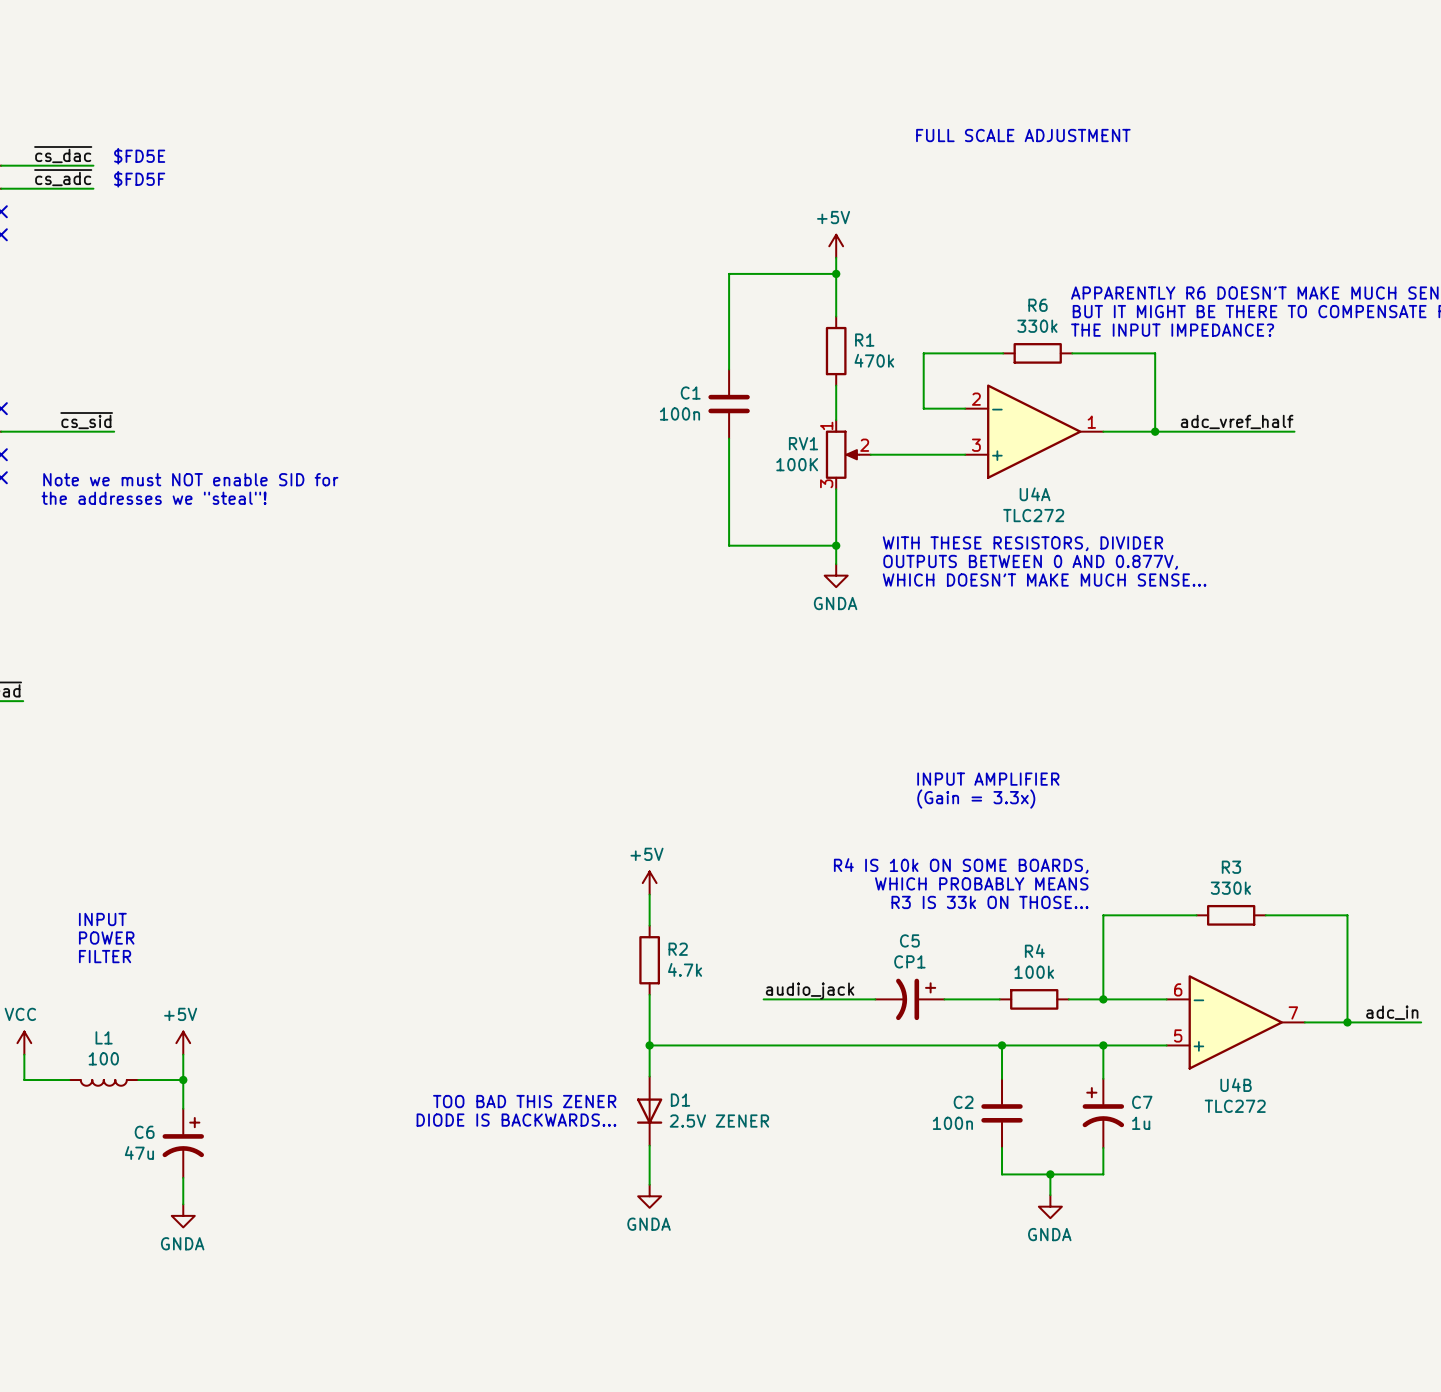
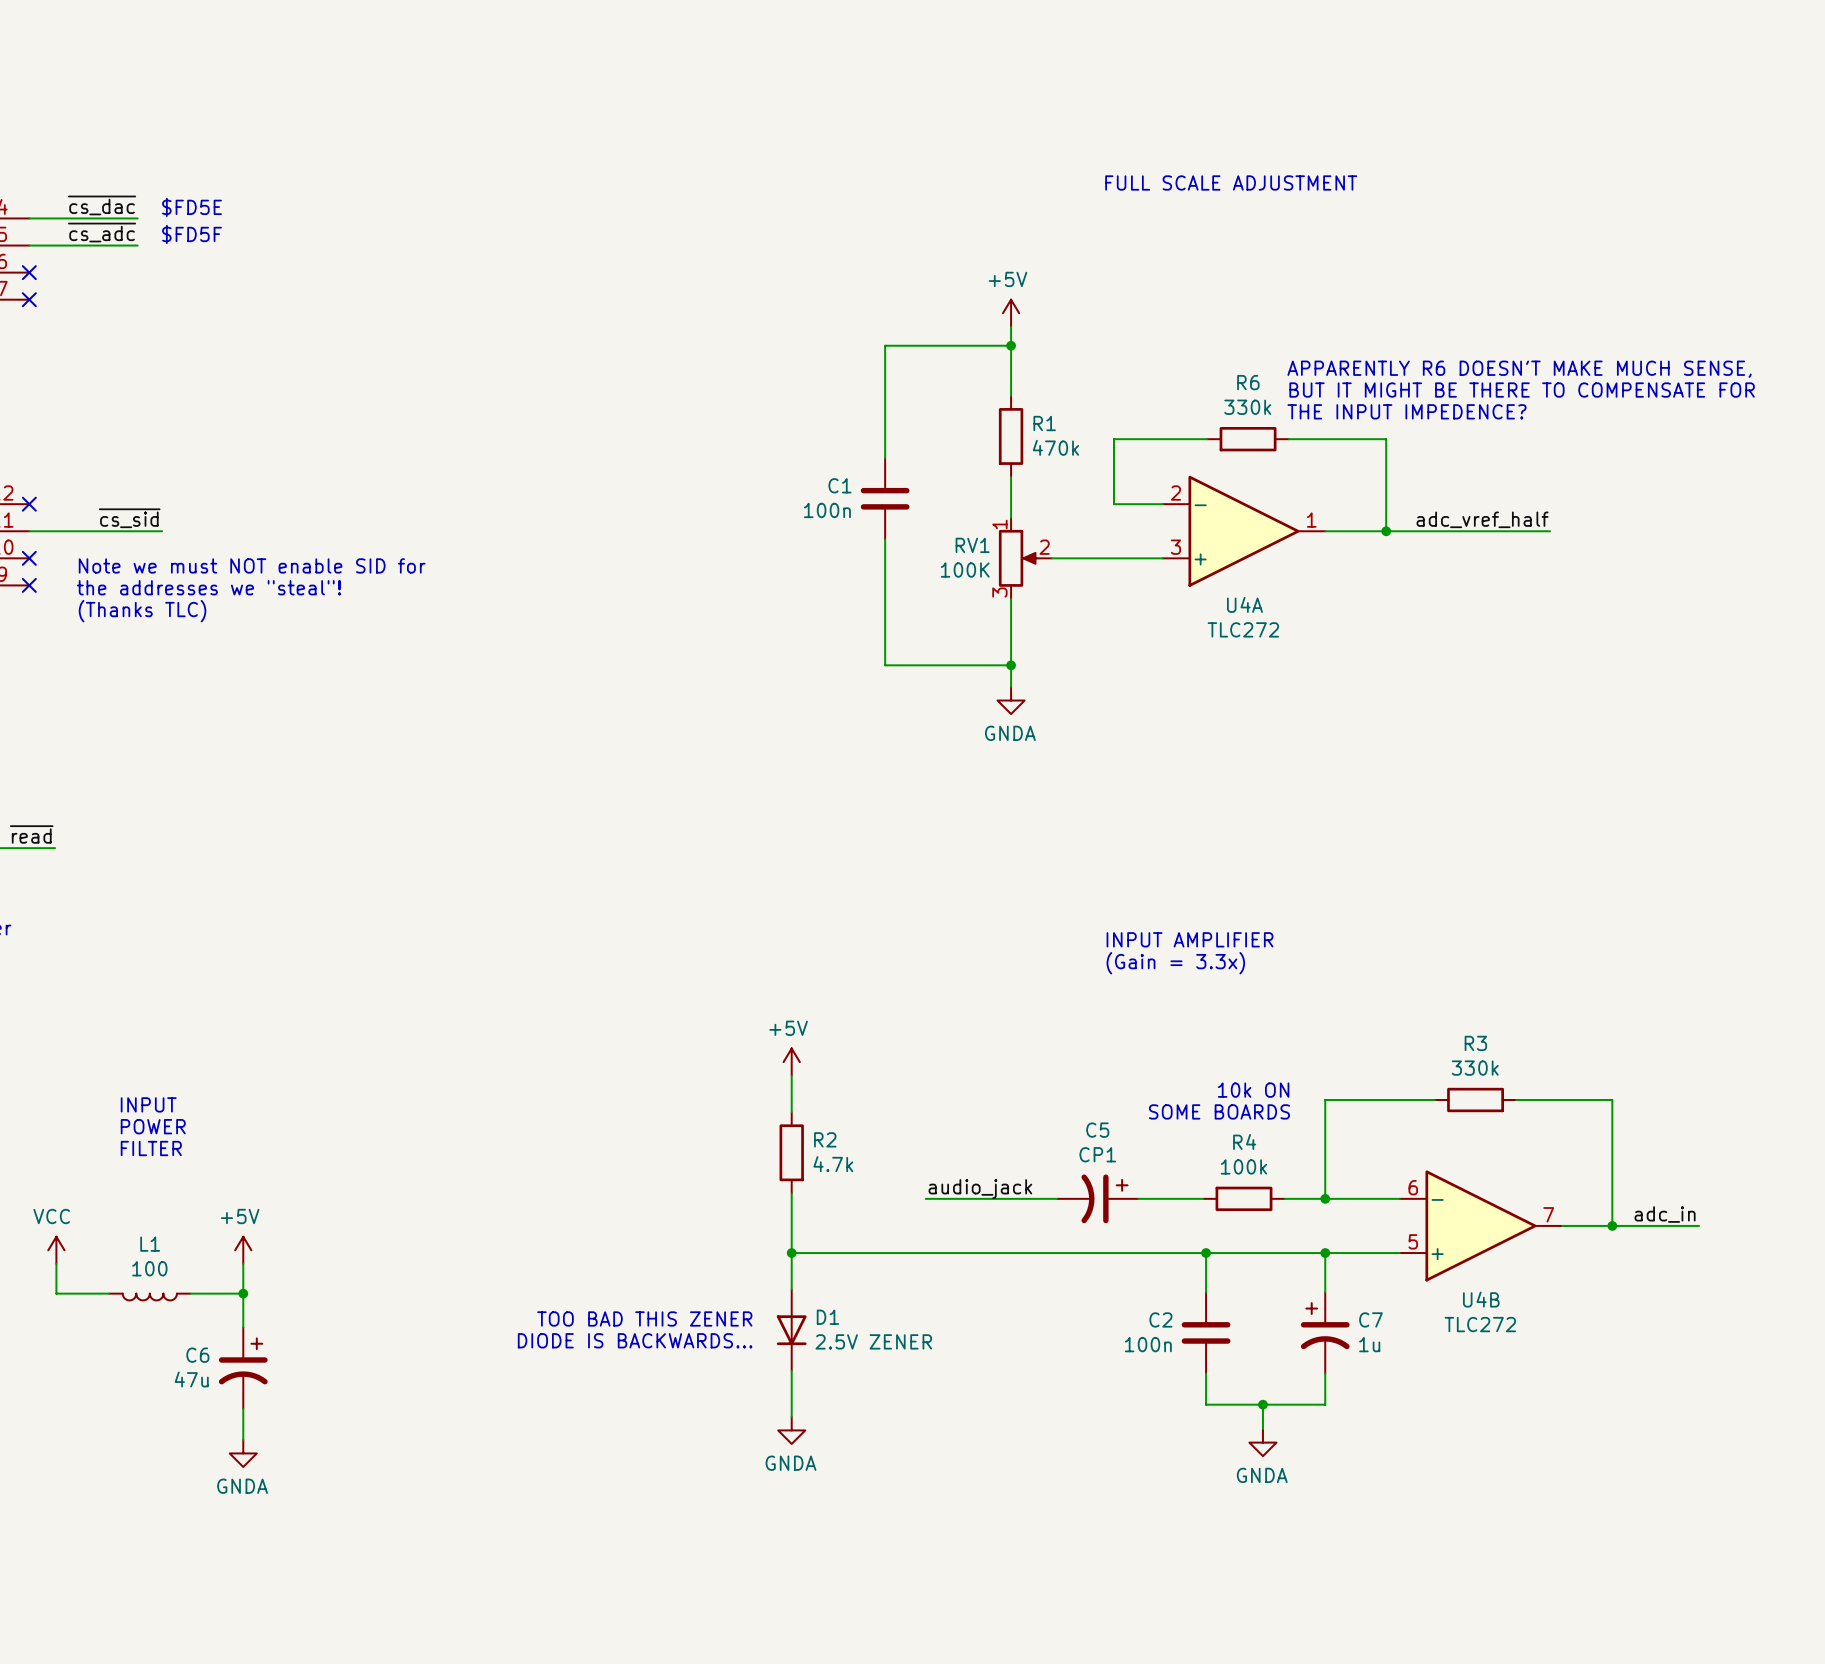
text: THE INPUT IMPEDANCE? (1172, 330) -> THE INPUT IMPEDENCE? (1406, 411)
text: none -> Note we must NOT enable SID for (252, 565)
text: Note we must NOT enable SID for (190, 479) -> the addresses we "steal"! (208, 587)
text: the addresses we "steal"! (154, 498) -> (Thanks TLC) (142, 611)
text: WITH THESE RESISTORS, DIVIDER (1022, 543) -> none
text: OUTPUTS BETWEEN 0 AND 0.877V, (1030, 562) -> none
text: WHICH DOESN'T MAKE MUCH SENSE... (1044, 580) -> none
text: R4 IS 10k ON SOME BOARDS, (961, 865) -> none
text: WHICH PROBABLY MEANS (981, 883) -> none
text: R3 IS 33k ON THOSE... (989, 902) -> none
text: none -> 10k ON (1253, 1090)
text: none -> SOME BOARDS (1219, 1111)

